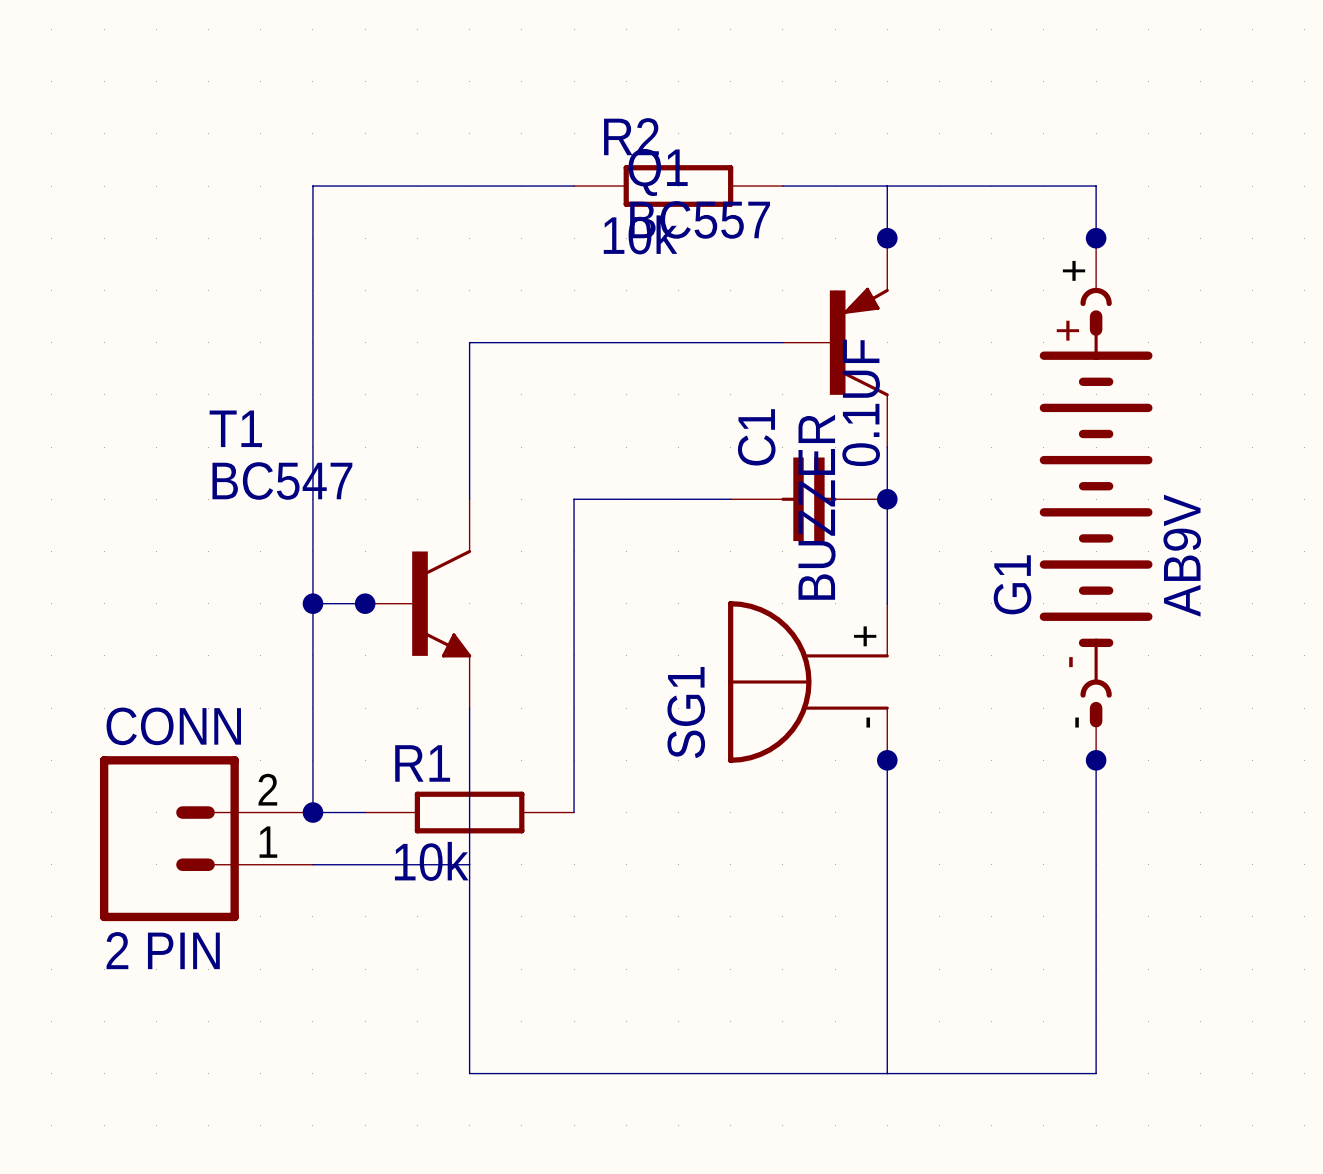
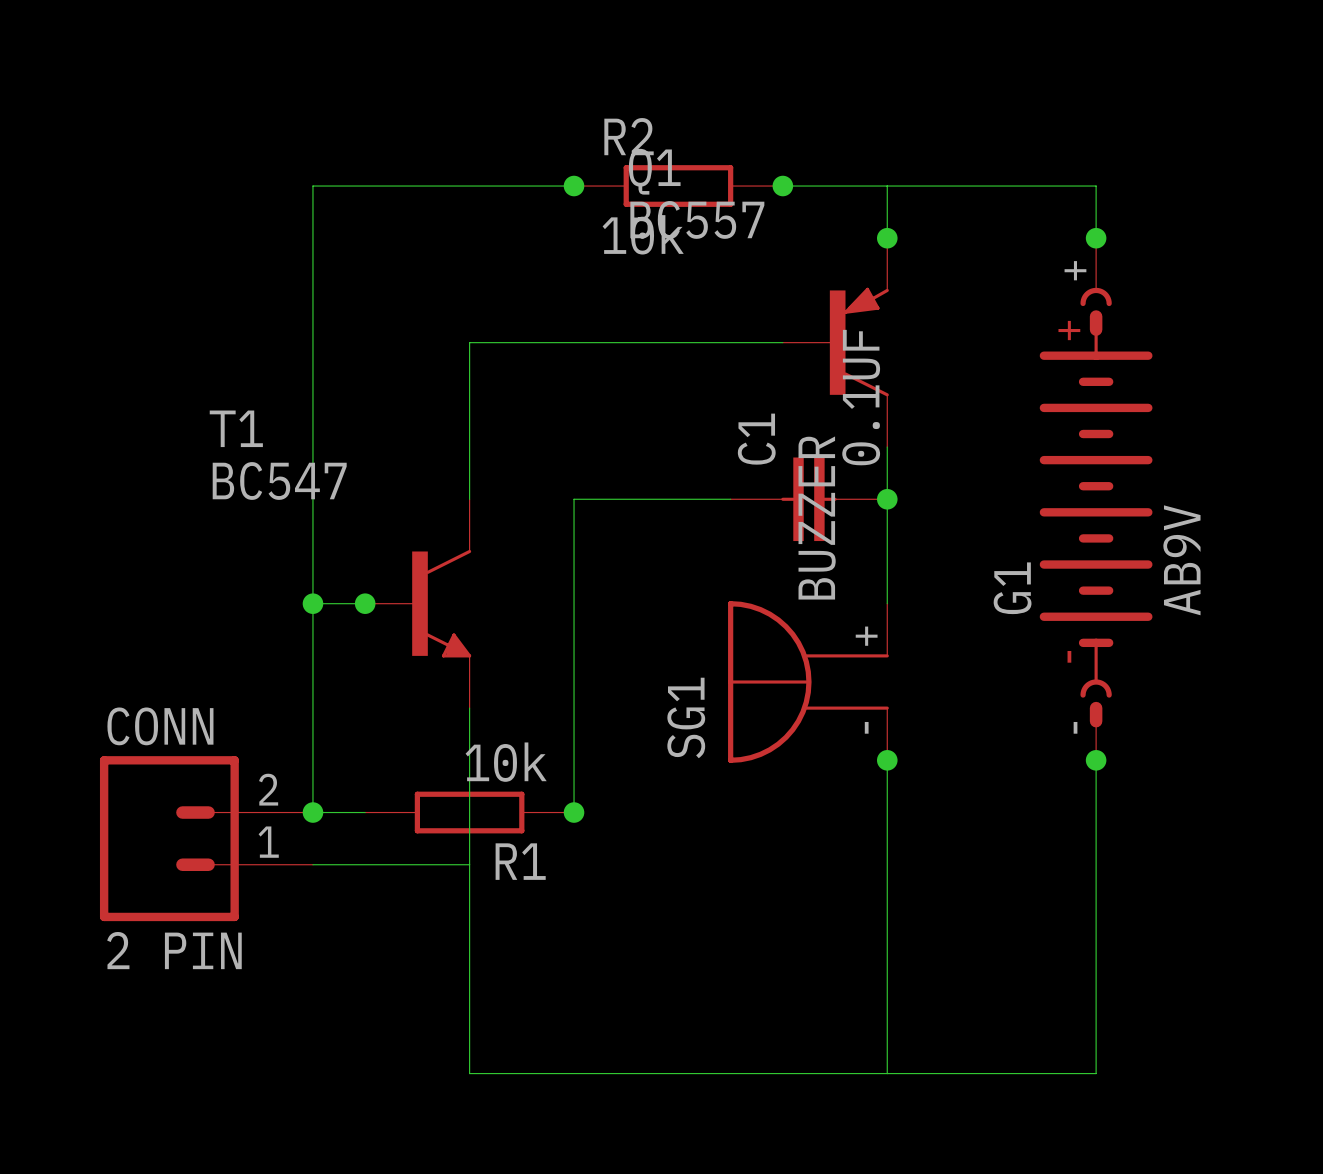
junction: none -> (574, 186)
junction: none -> (782, 186)
R1 name position: R1 (422, 763) -> R1 (520, 861)
junction: none -> (574, 812)
R1 value position: 10k (431, 861) -> 10k (506, 762)

